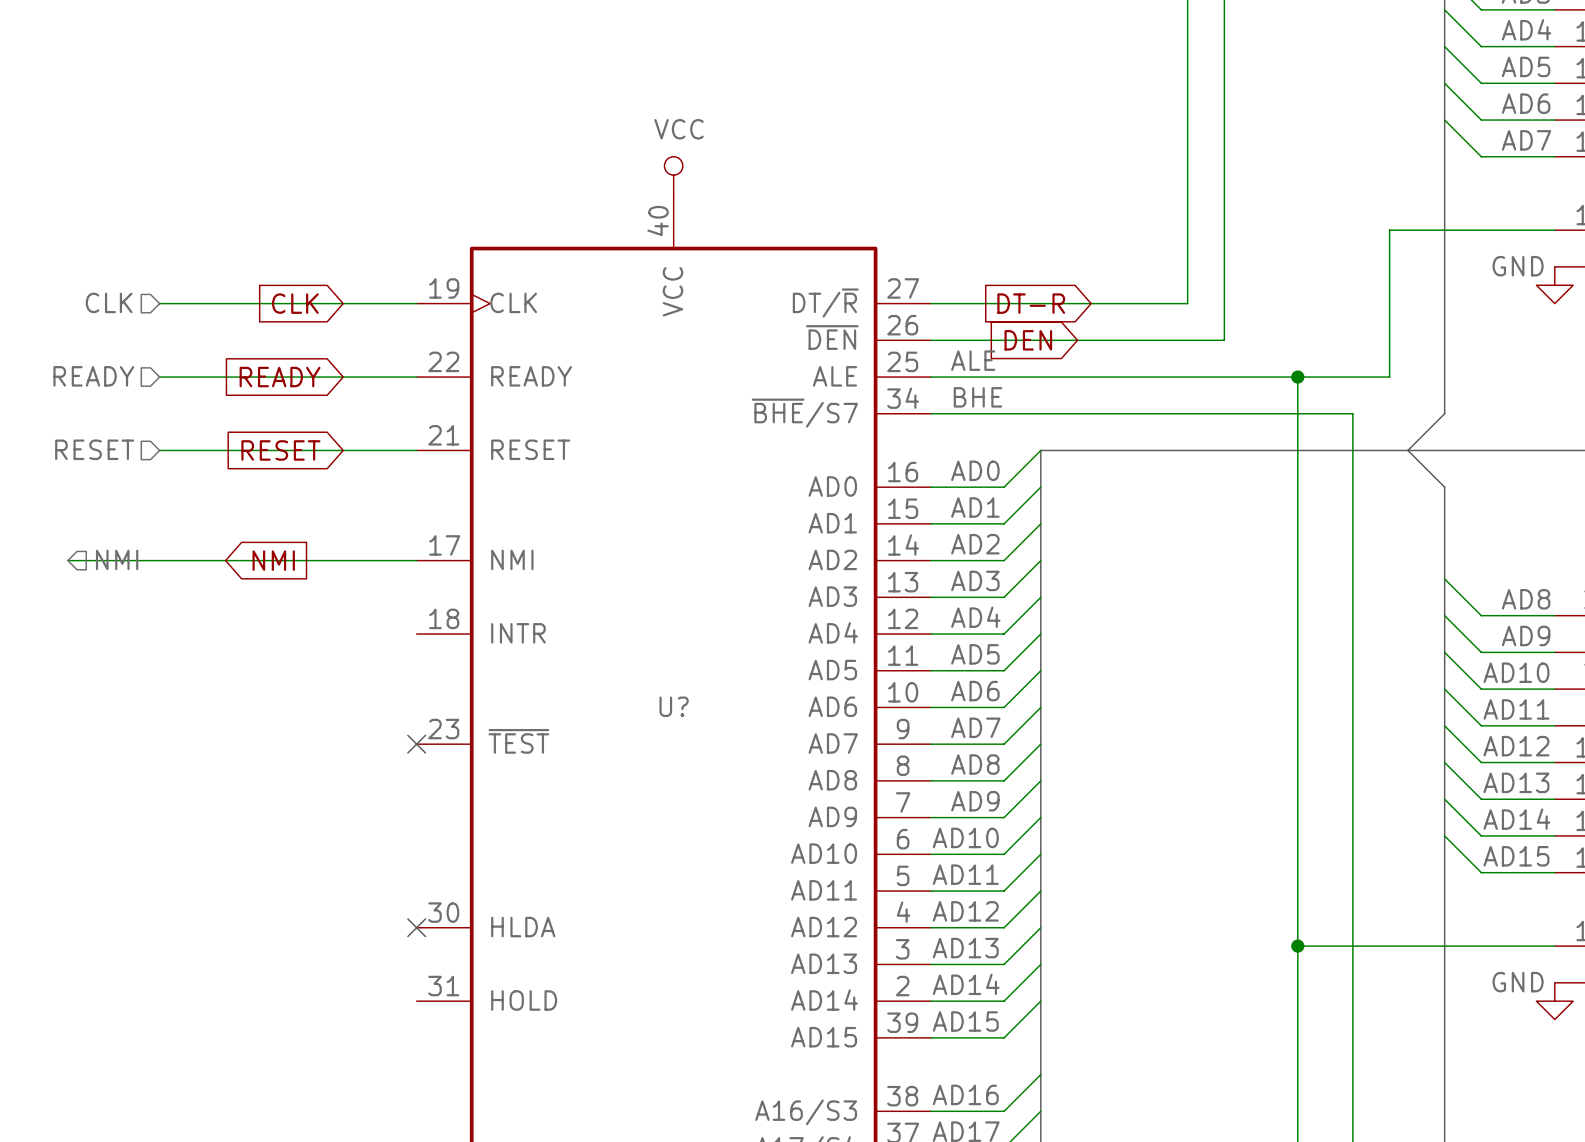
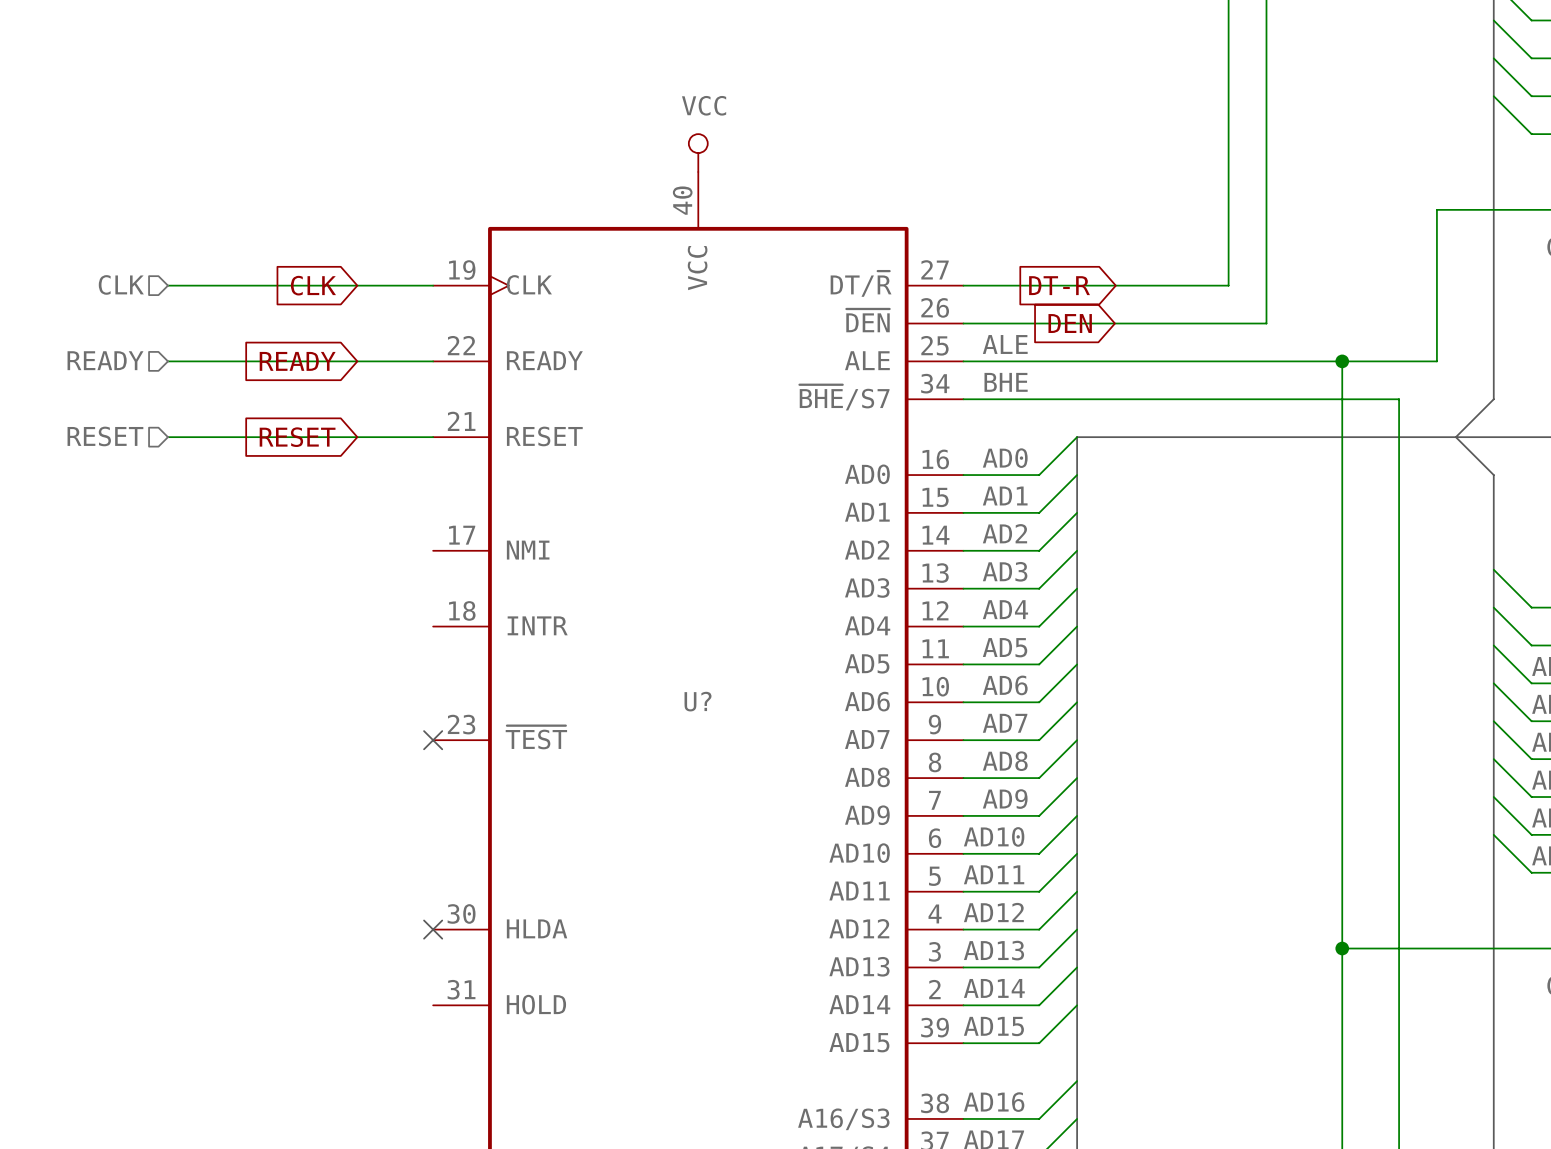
hierarchical label: NMI (117, 559) -> none
wire: (67, 560) (416, 560) -> none
global label: NMI (273, 560) -> none

